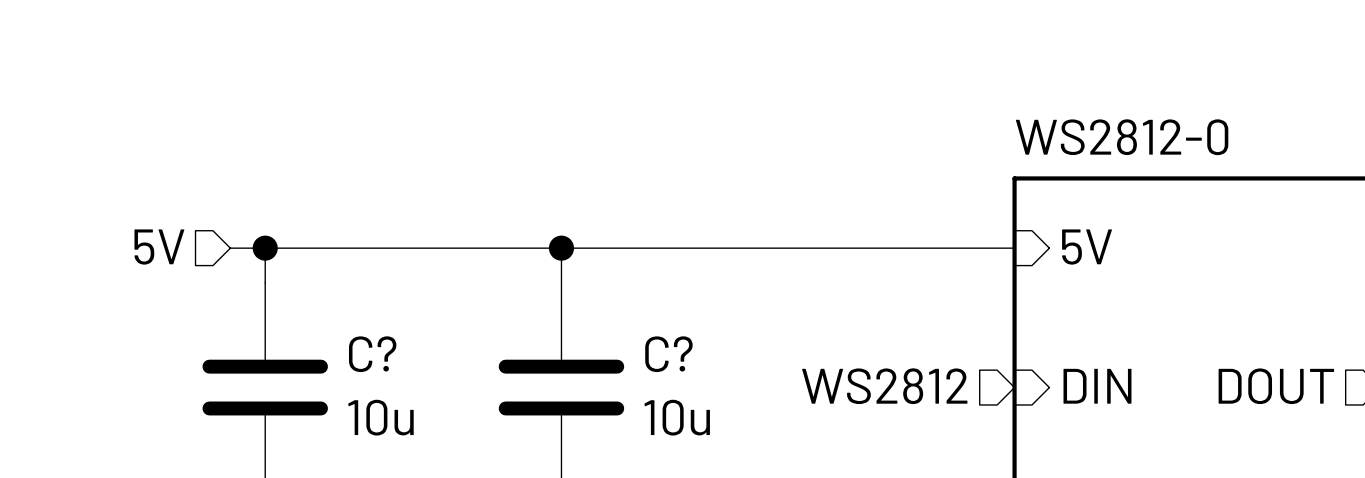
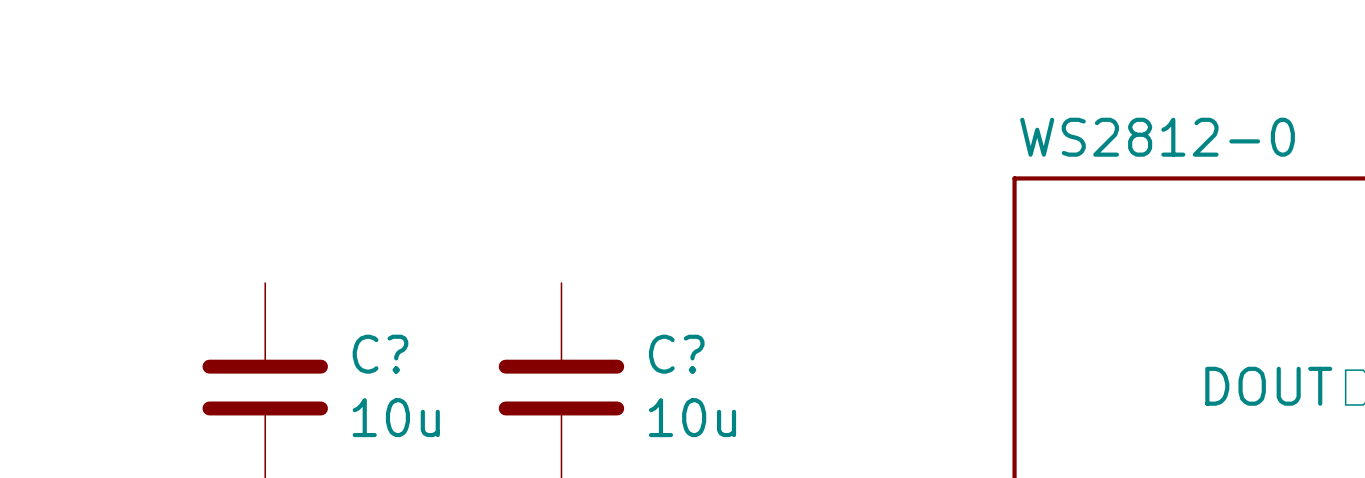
hierarchical label: 5V (159, 247) -> none
sheet pin: 5V (1087, 247) -> none
wire: (230, 248) (1014, 248) -> none
wire: (265, 248) (265, 283) -> none
junction: (265, 248) -> none
wire: (561, 248) (561, 283) -> none
junction: (561, 248) -> none
hierarchical label: WS2812 (884, 386) -> none
sheet pin: DIN (1097, 386) -> none

